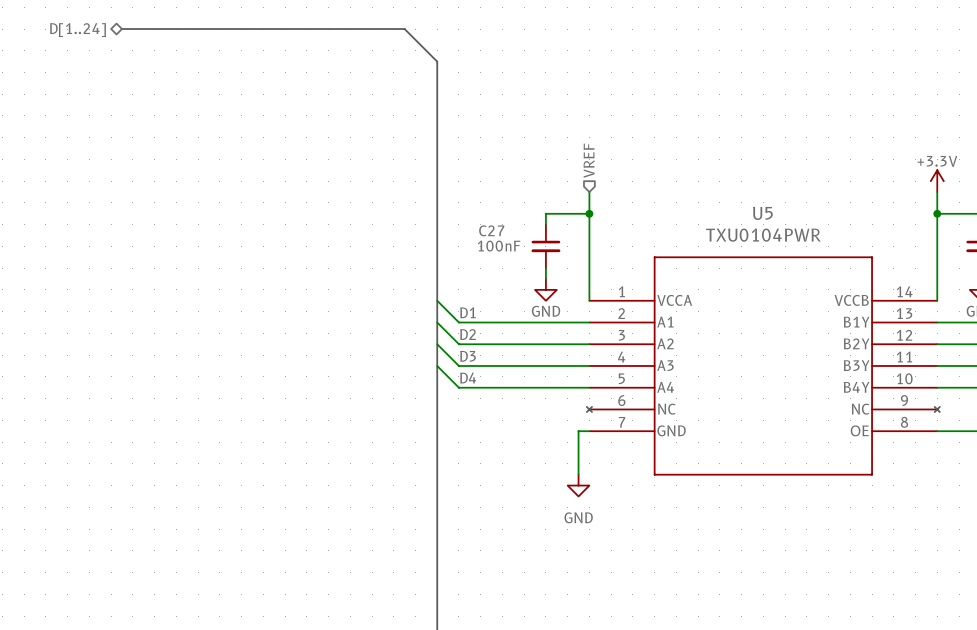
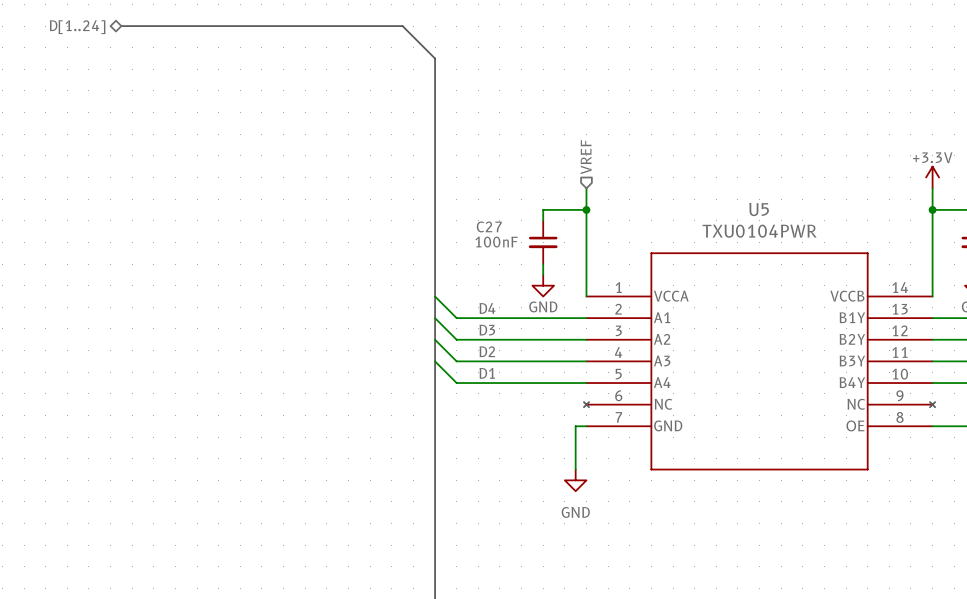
label position: D1 (467, 312) -> D1 (487, 373)
label position: D2 (468, 334) -> D2 (487, 351)
label position: D3 (468, 356) -> D3 (487, 330)
label position: D4 (468, 378) -> D4 (487, 308)

